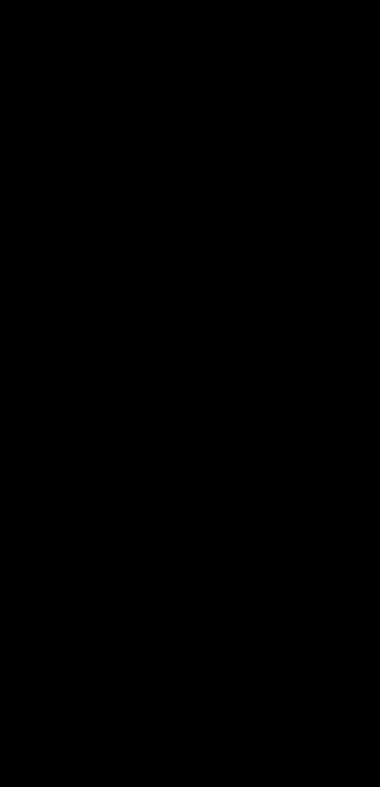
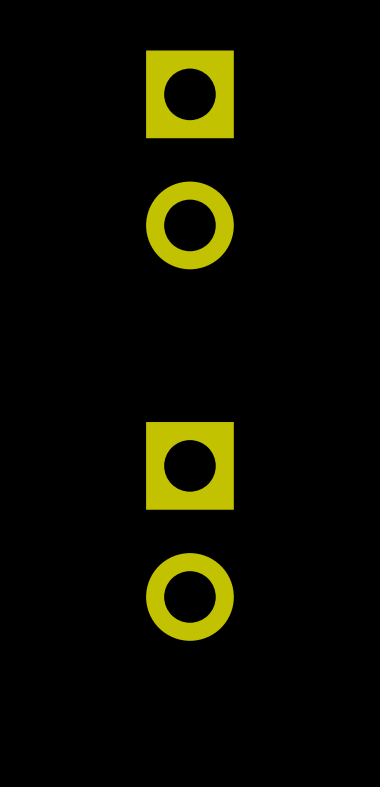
part: none -> (189, 159)
part: none -> (189, 531)

